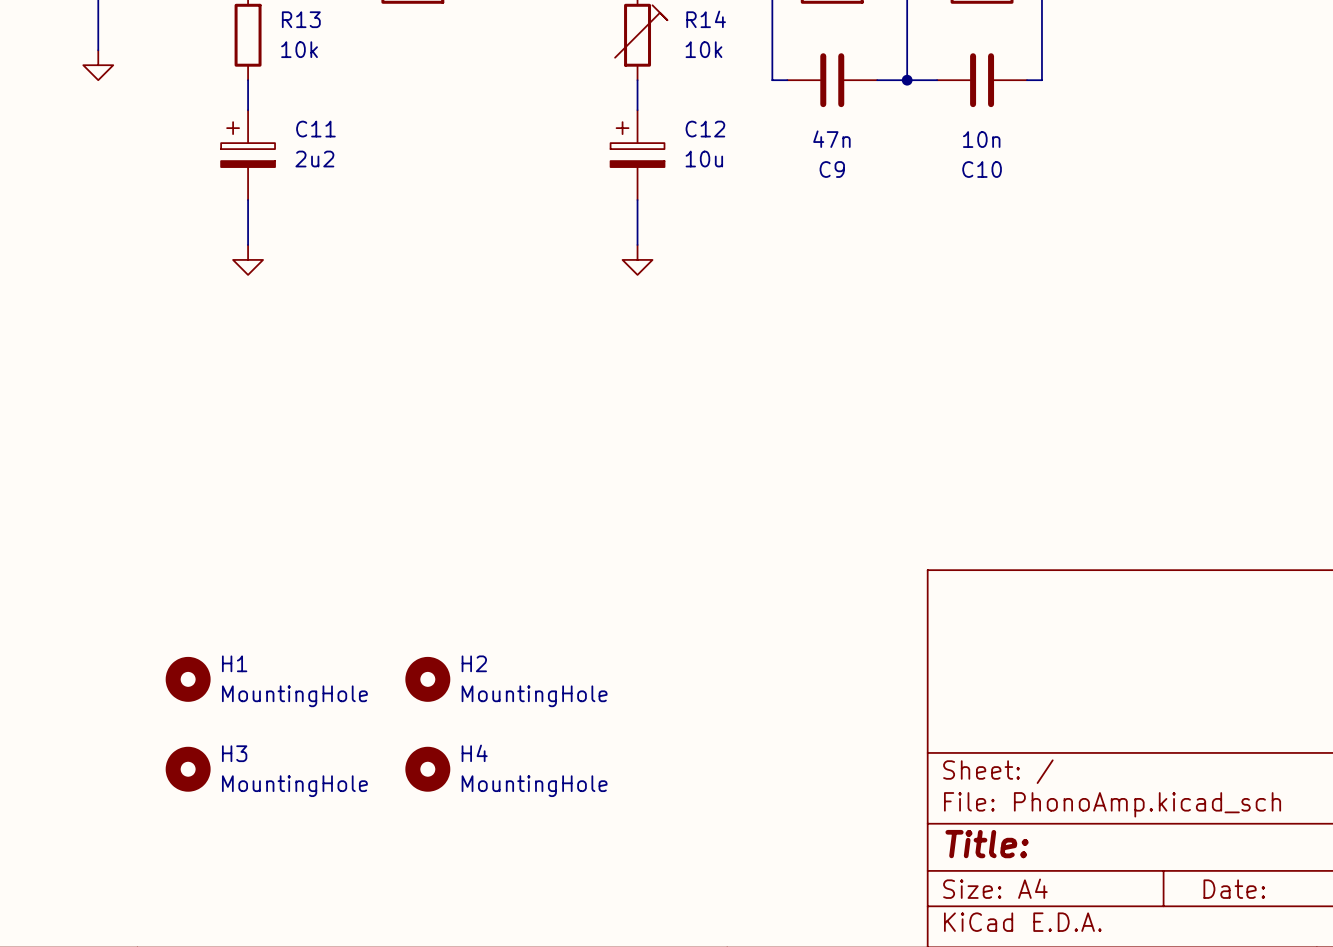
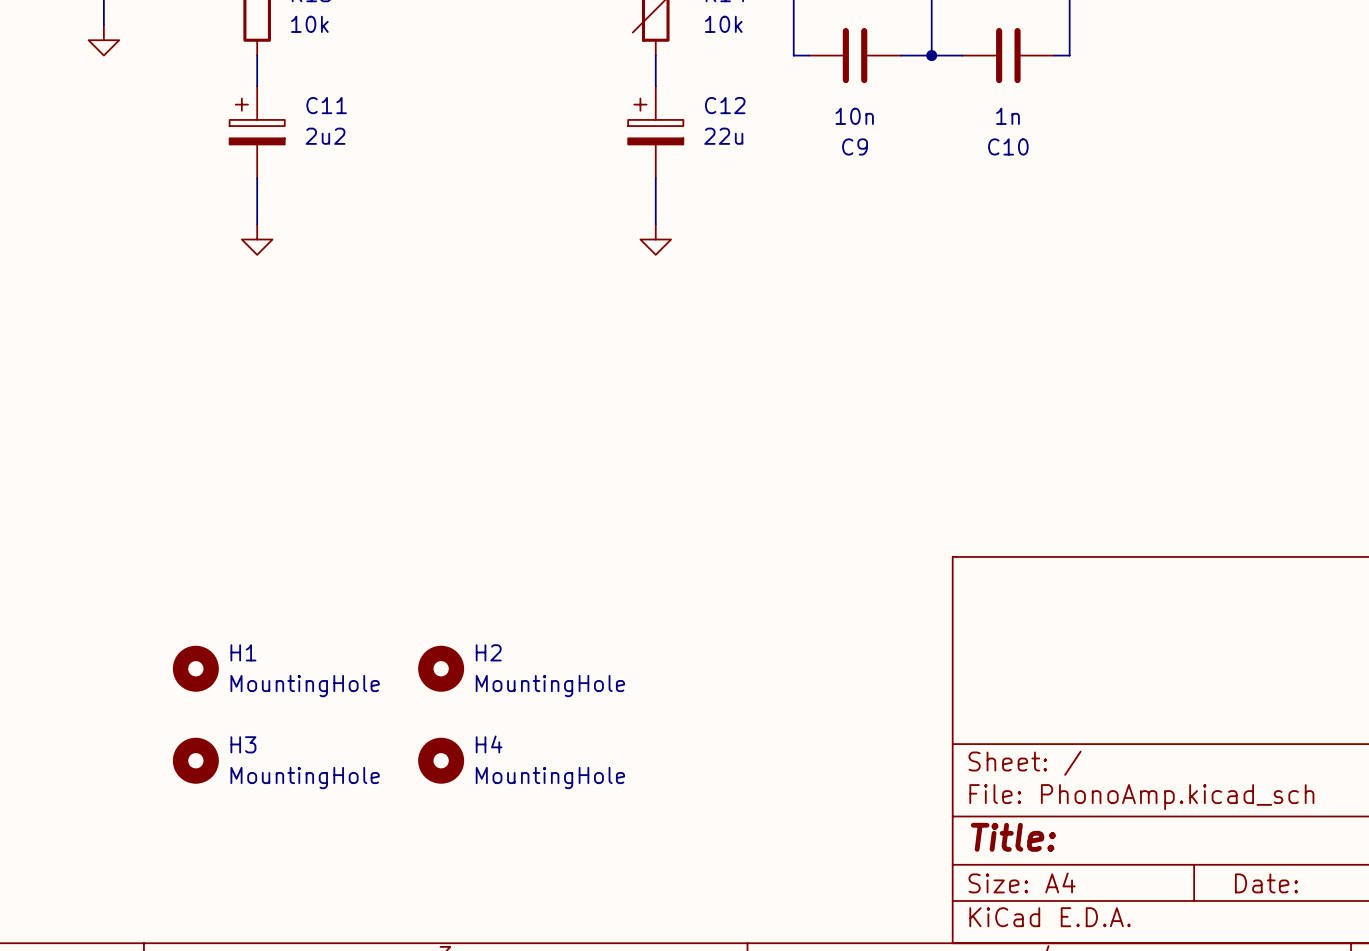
C9 value: 47n (831, 139) -> 10n (854, 116)
C10 value: 10n (981, 139) -> 1n (1007, 116)
C12 value: 10u (704, 159) -> 22u (723, 136)

